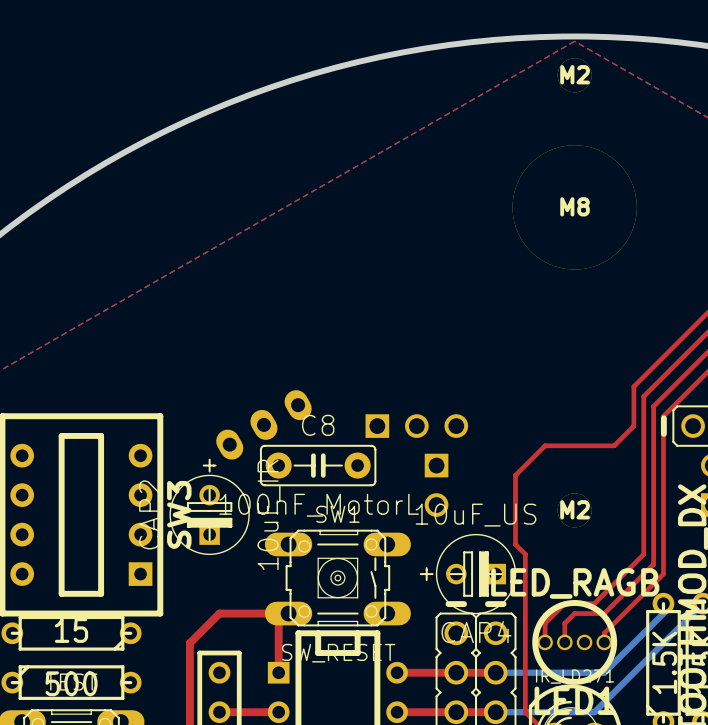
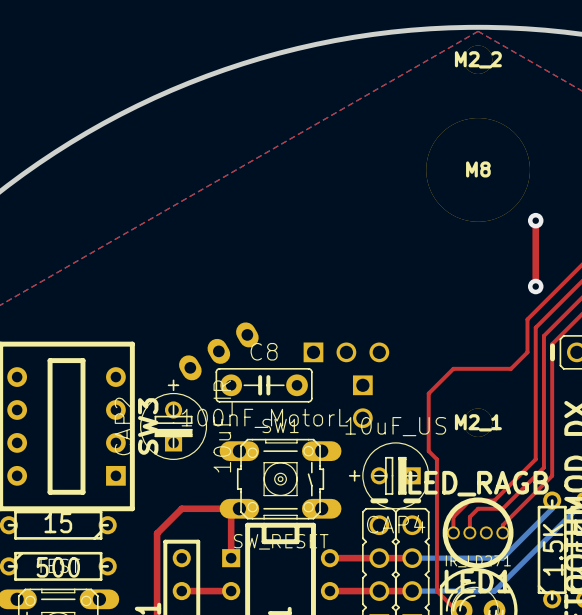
M2 name: M2 (575, 74) -> M2_2 (478, 59)
top track: none -> (535, 220) (535, 286)
via: none -> (535, 220)
via: none -> (535, 286)
M2 name: M2 (575, 509) -> M2_1 (478, 422)

